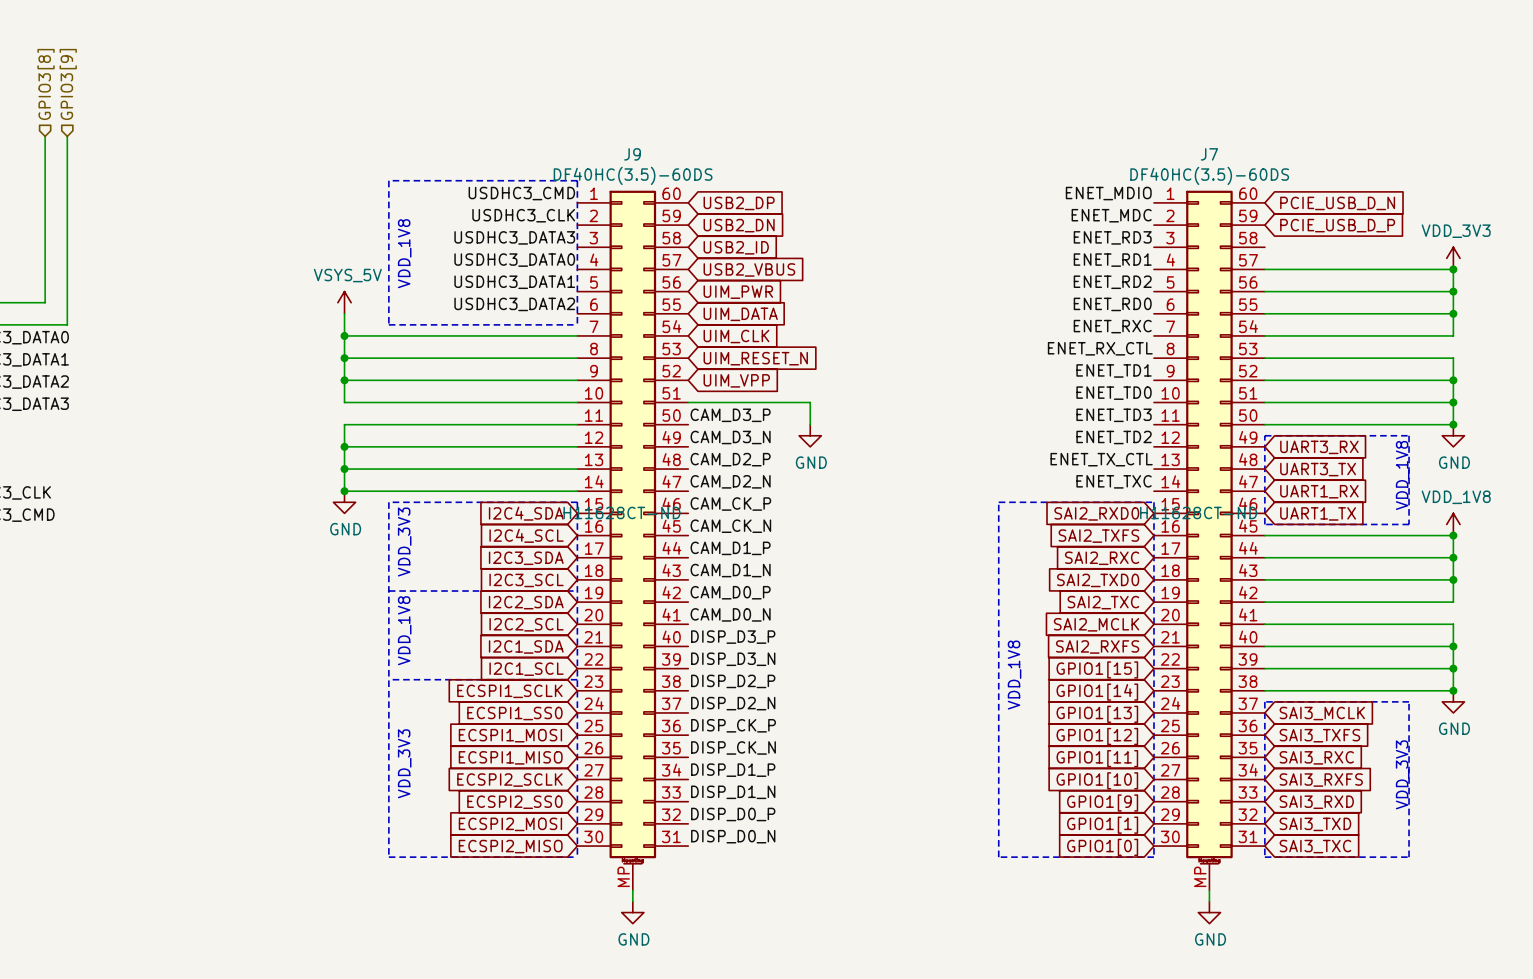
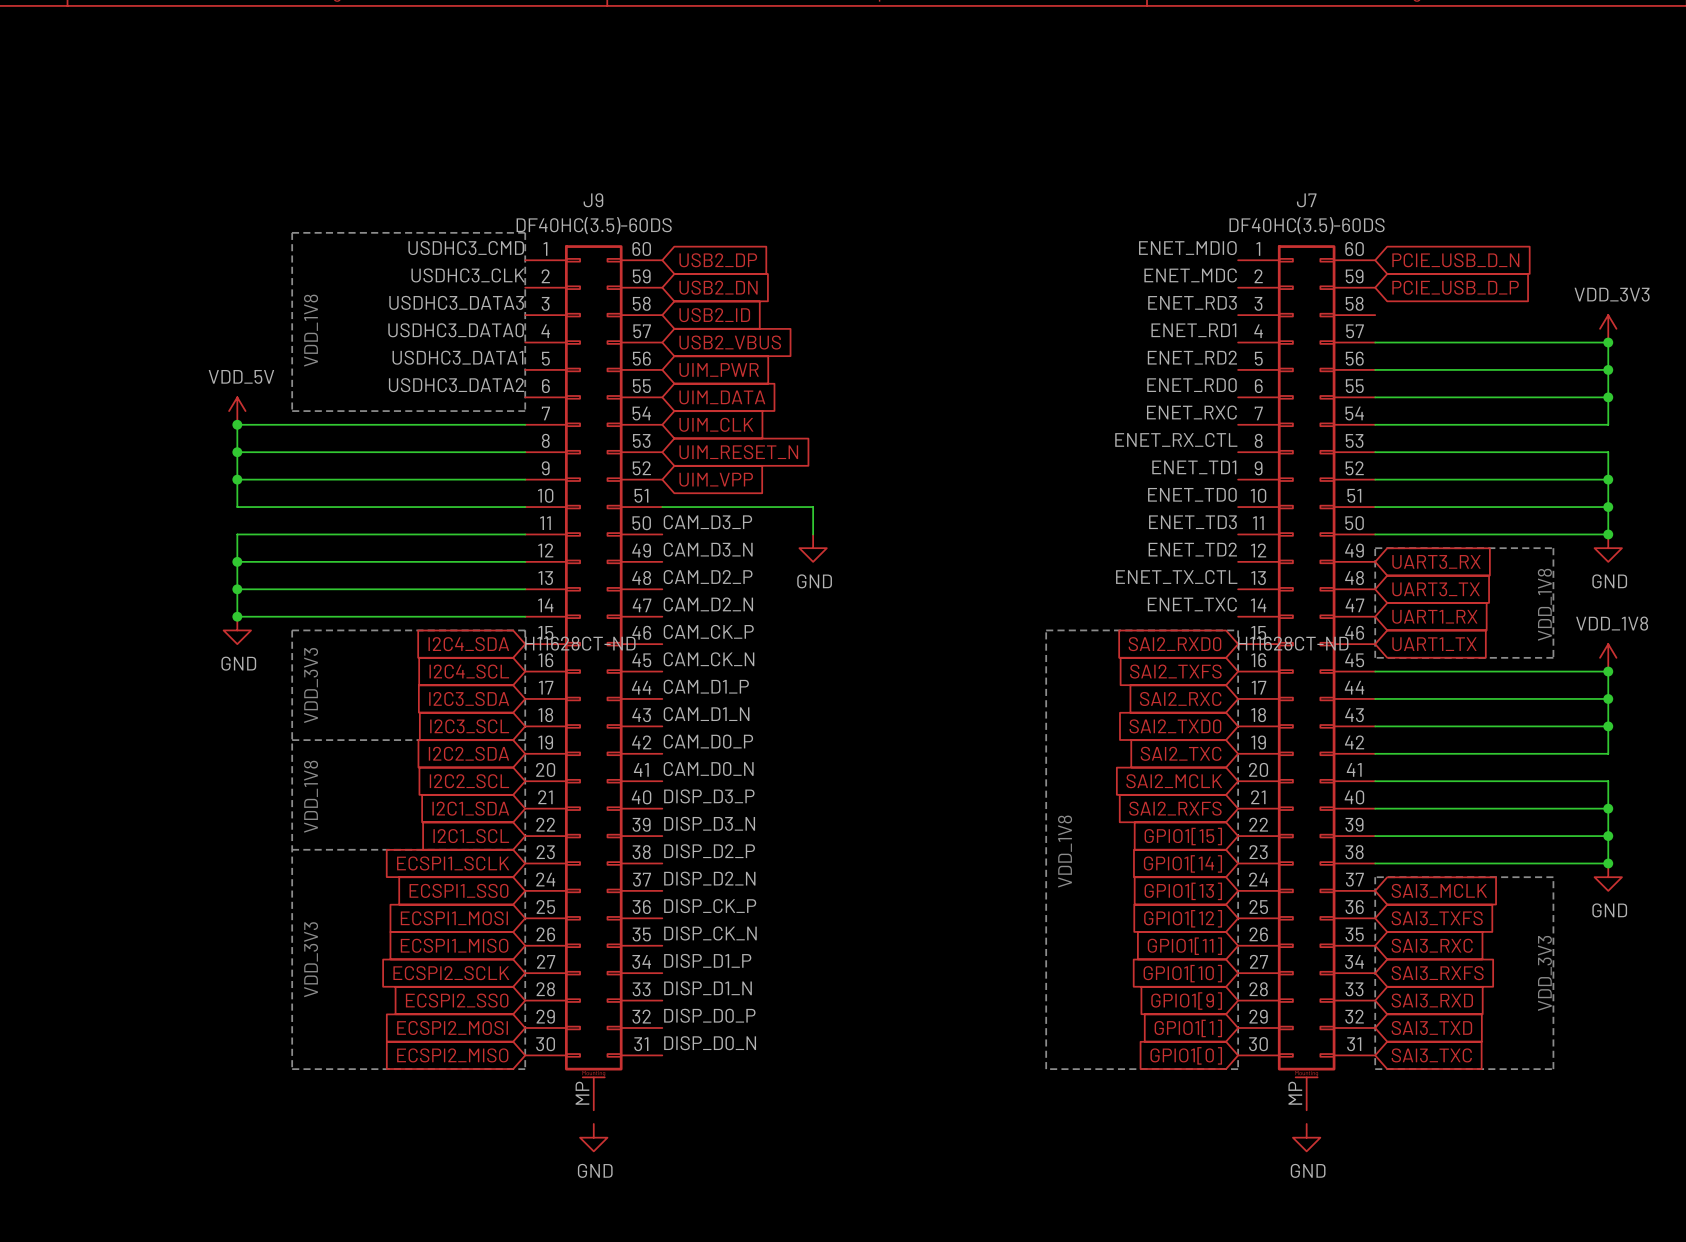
power symbol: VSYS_5V (344, 302) -> none
power symbol: none -> VDD_5V (237, 411)
wire: (632, 890) (632, 901) -> none
wire: (1209, 890) (1209, 901) -> none

